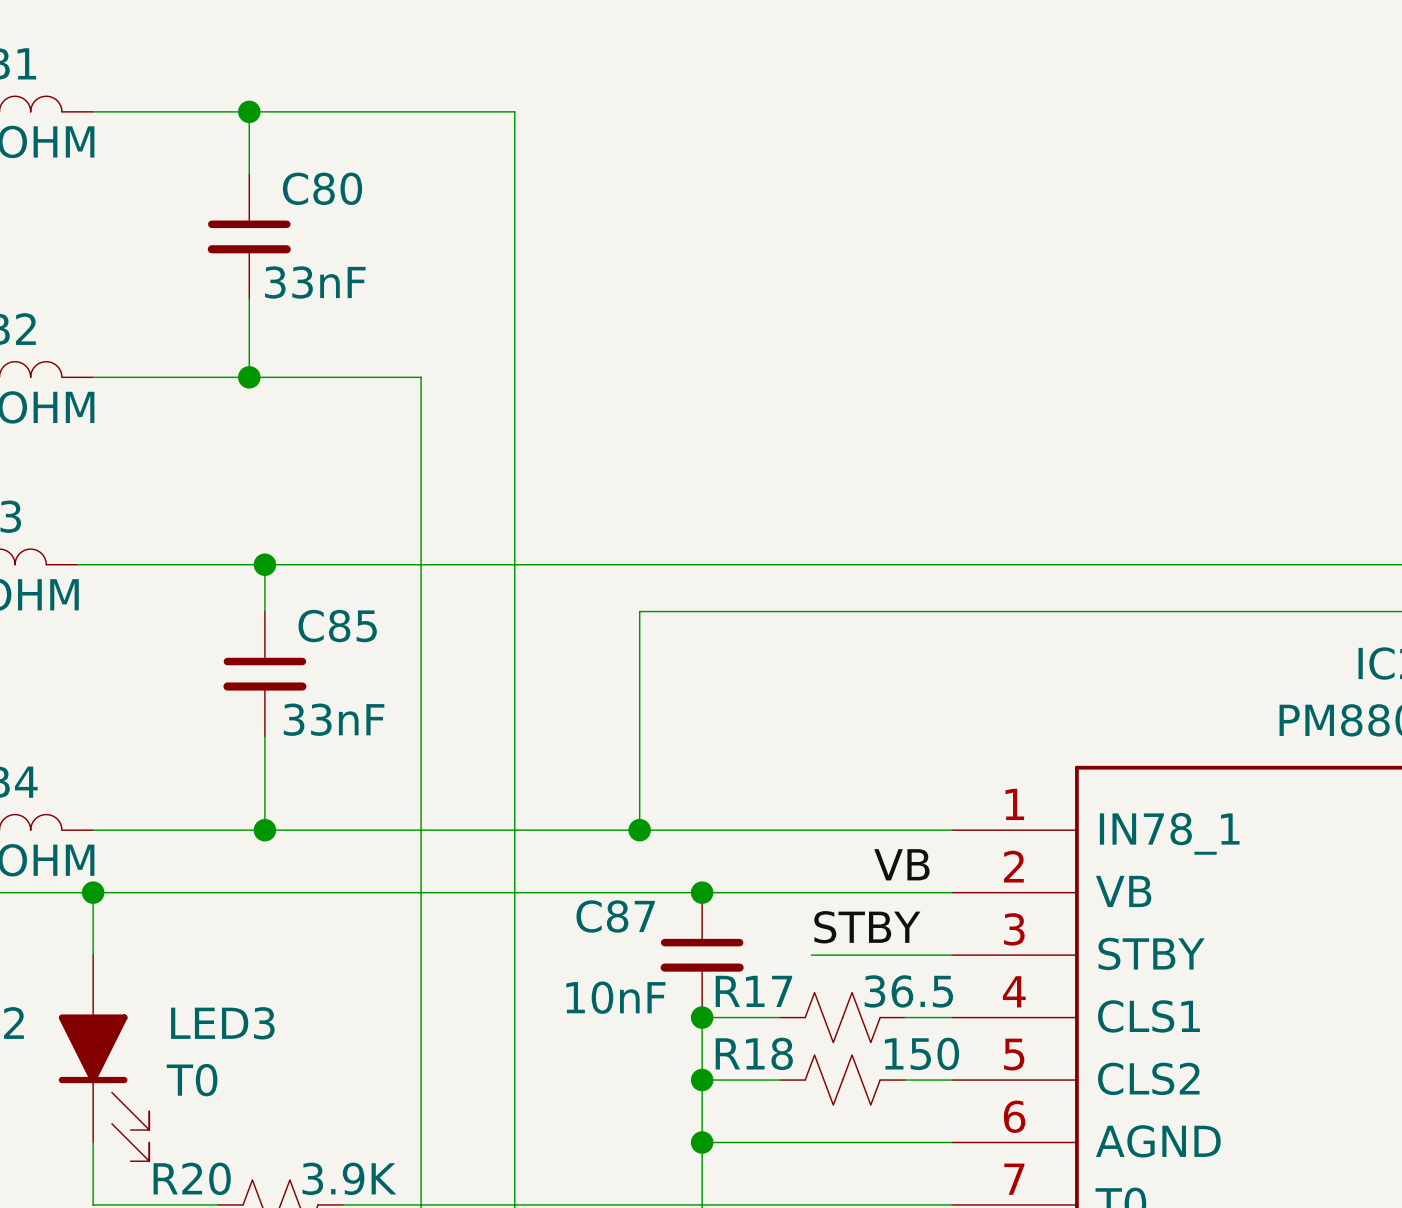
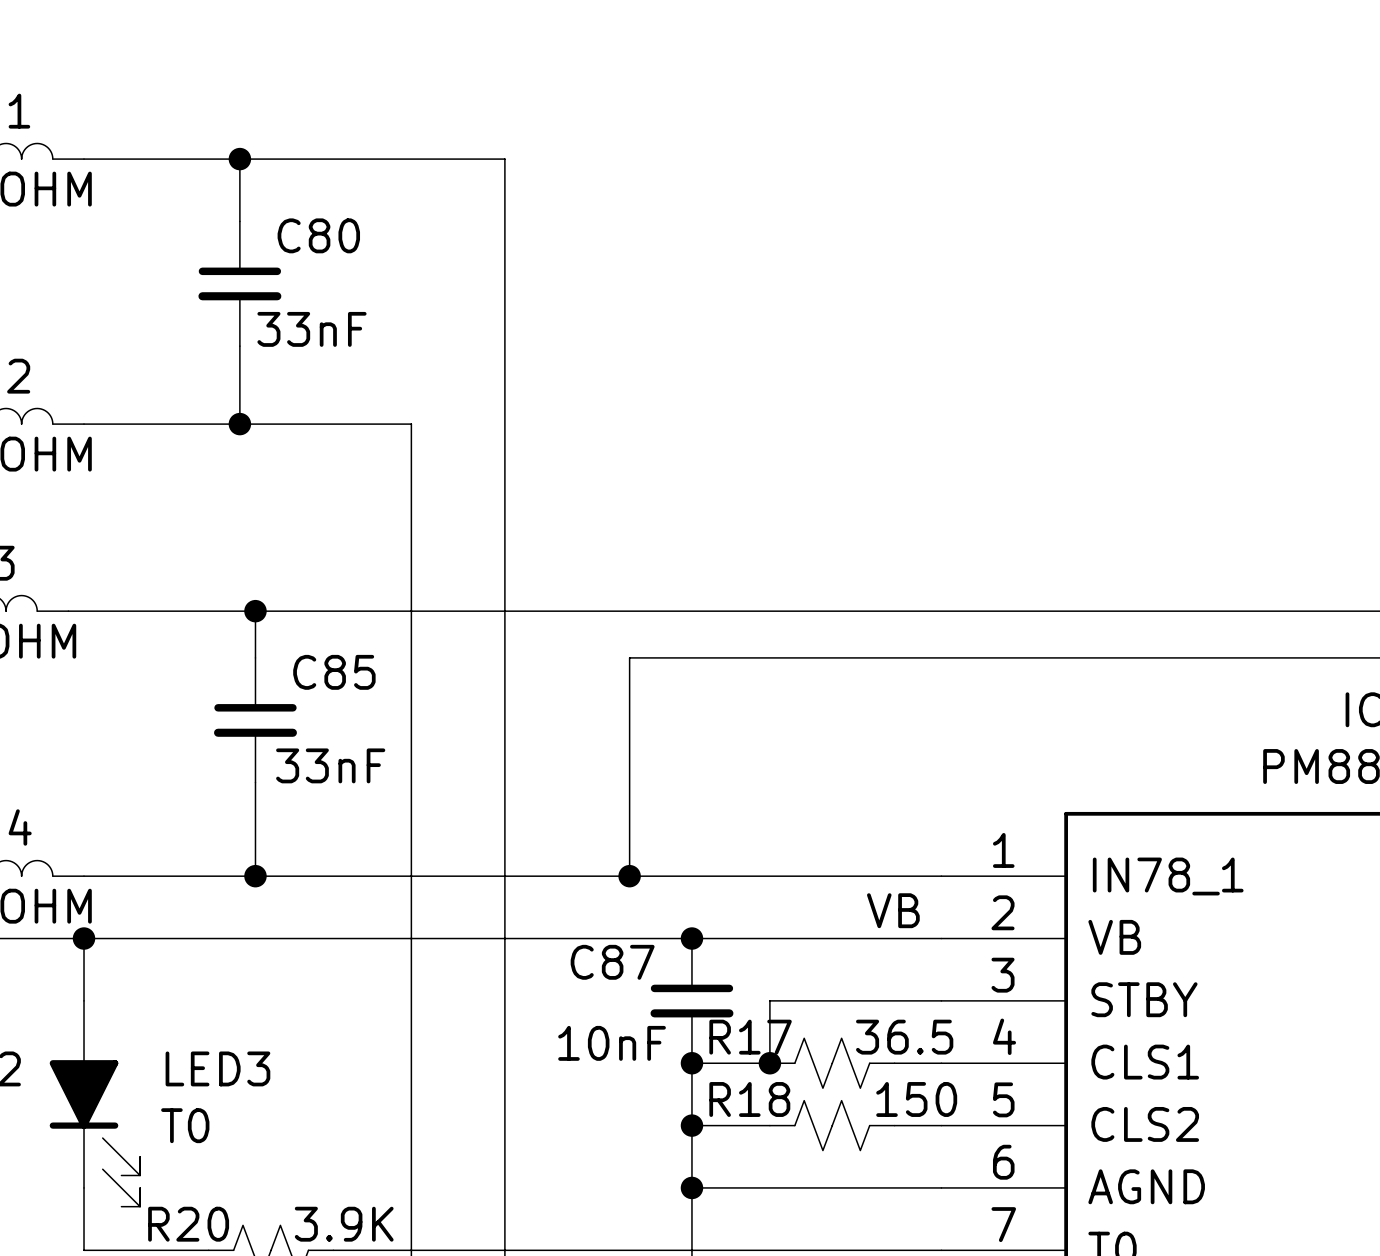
label: STBY (867, 927) -> none
wire: none -> (801, 1000) (769, 1000) (769, 1063)
junction: none -> (769, 1063)

